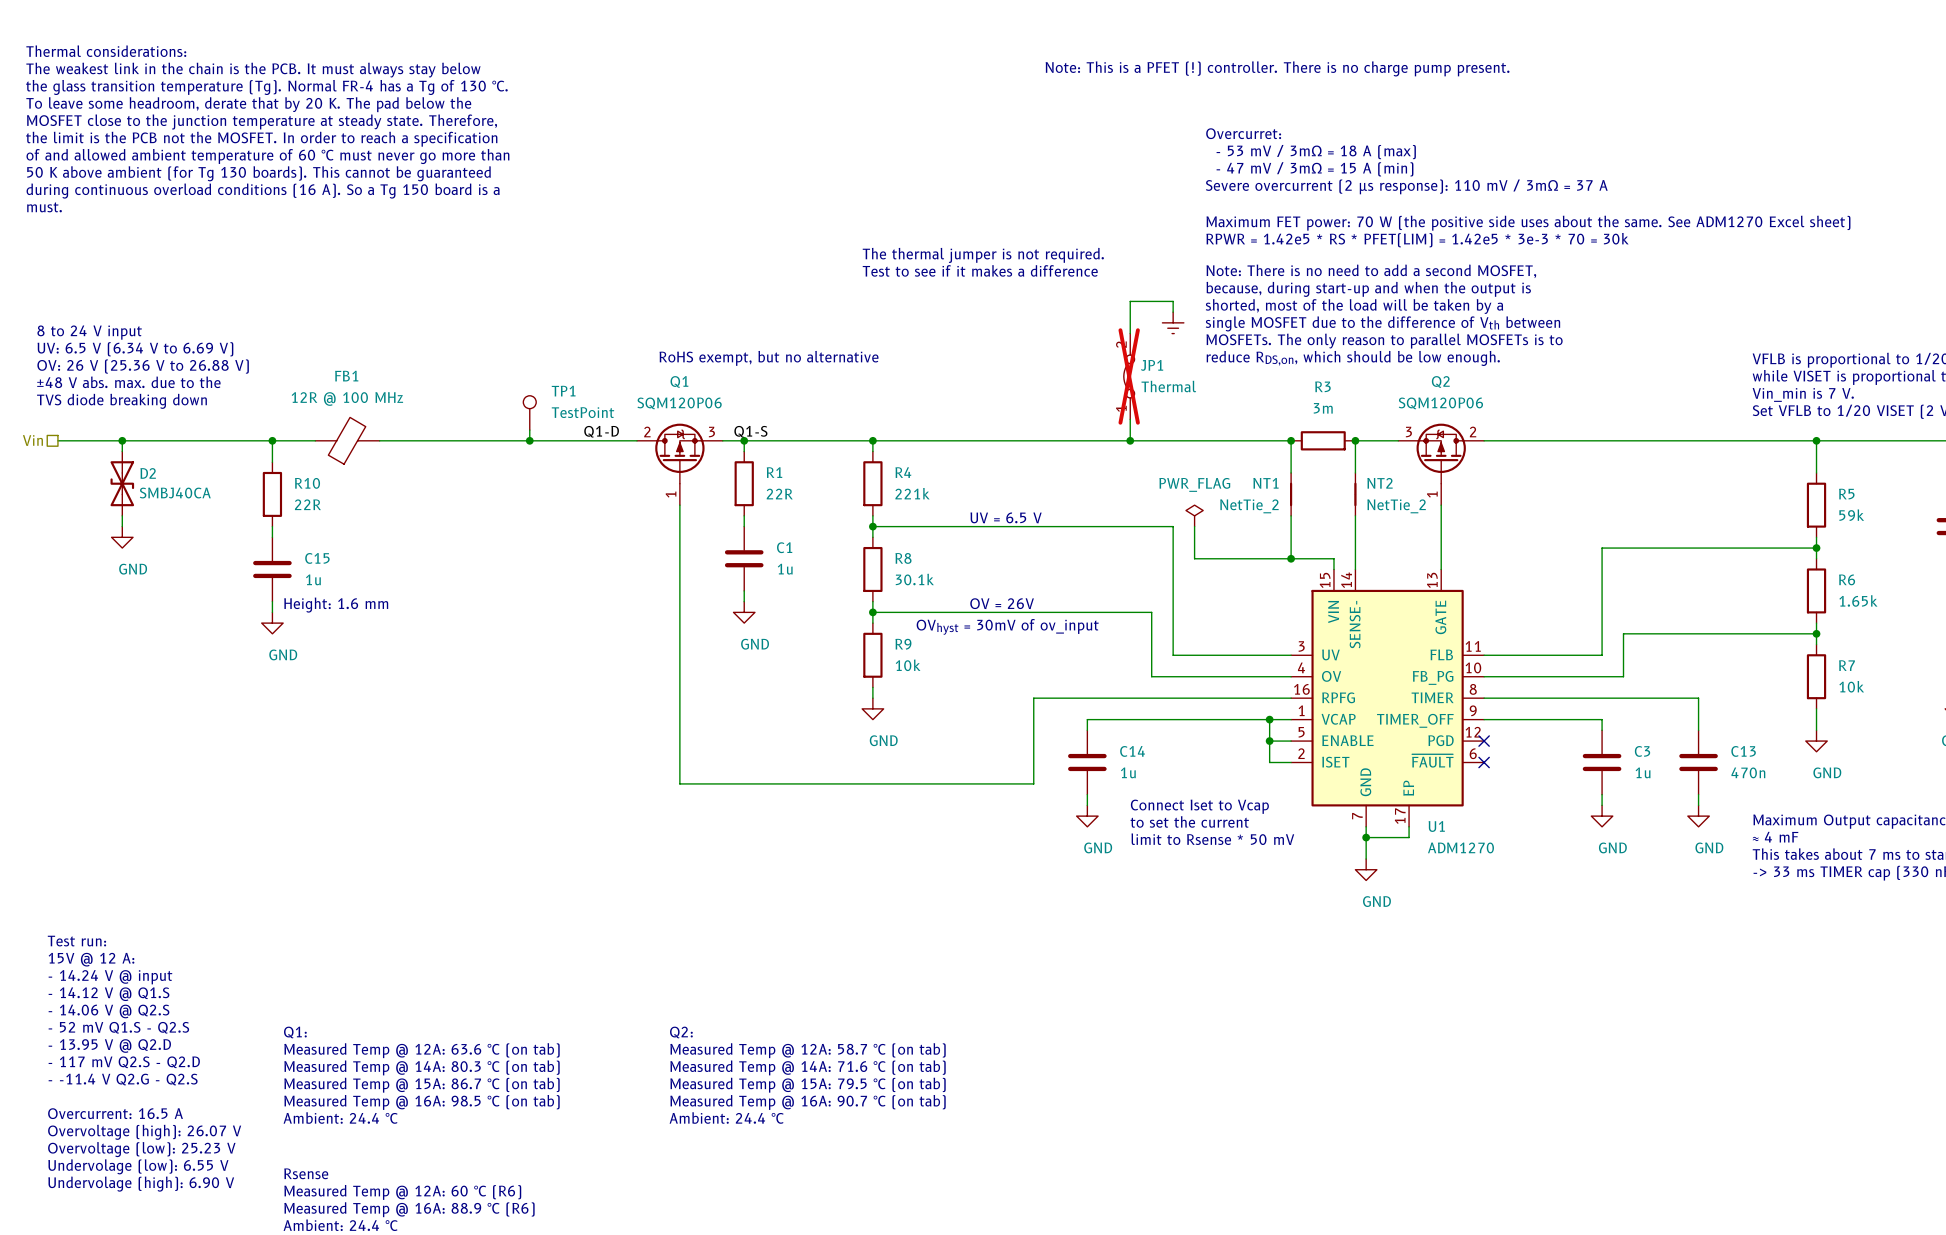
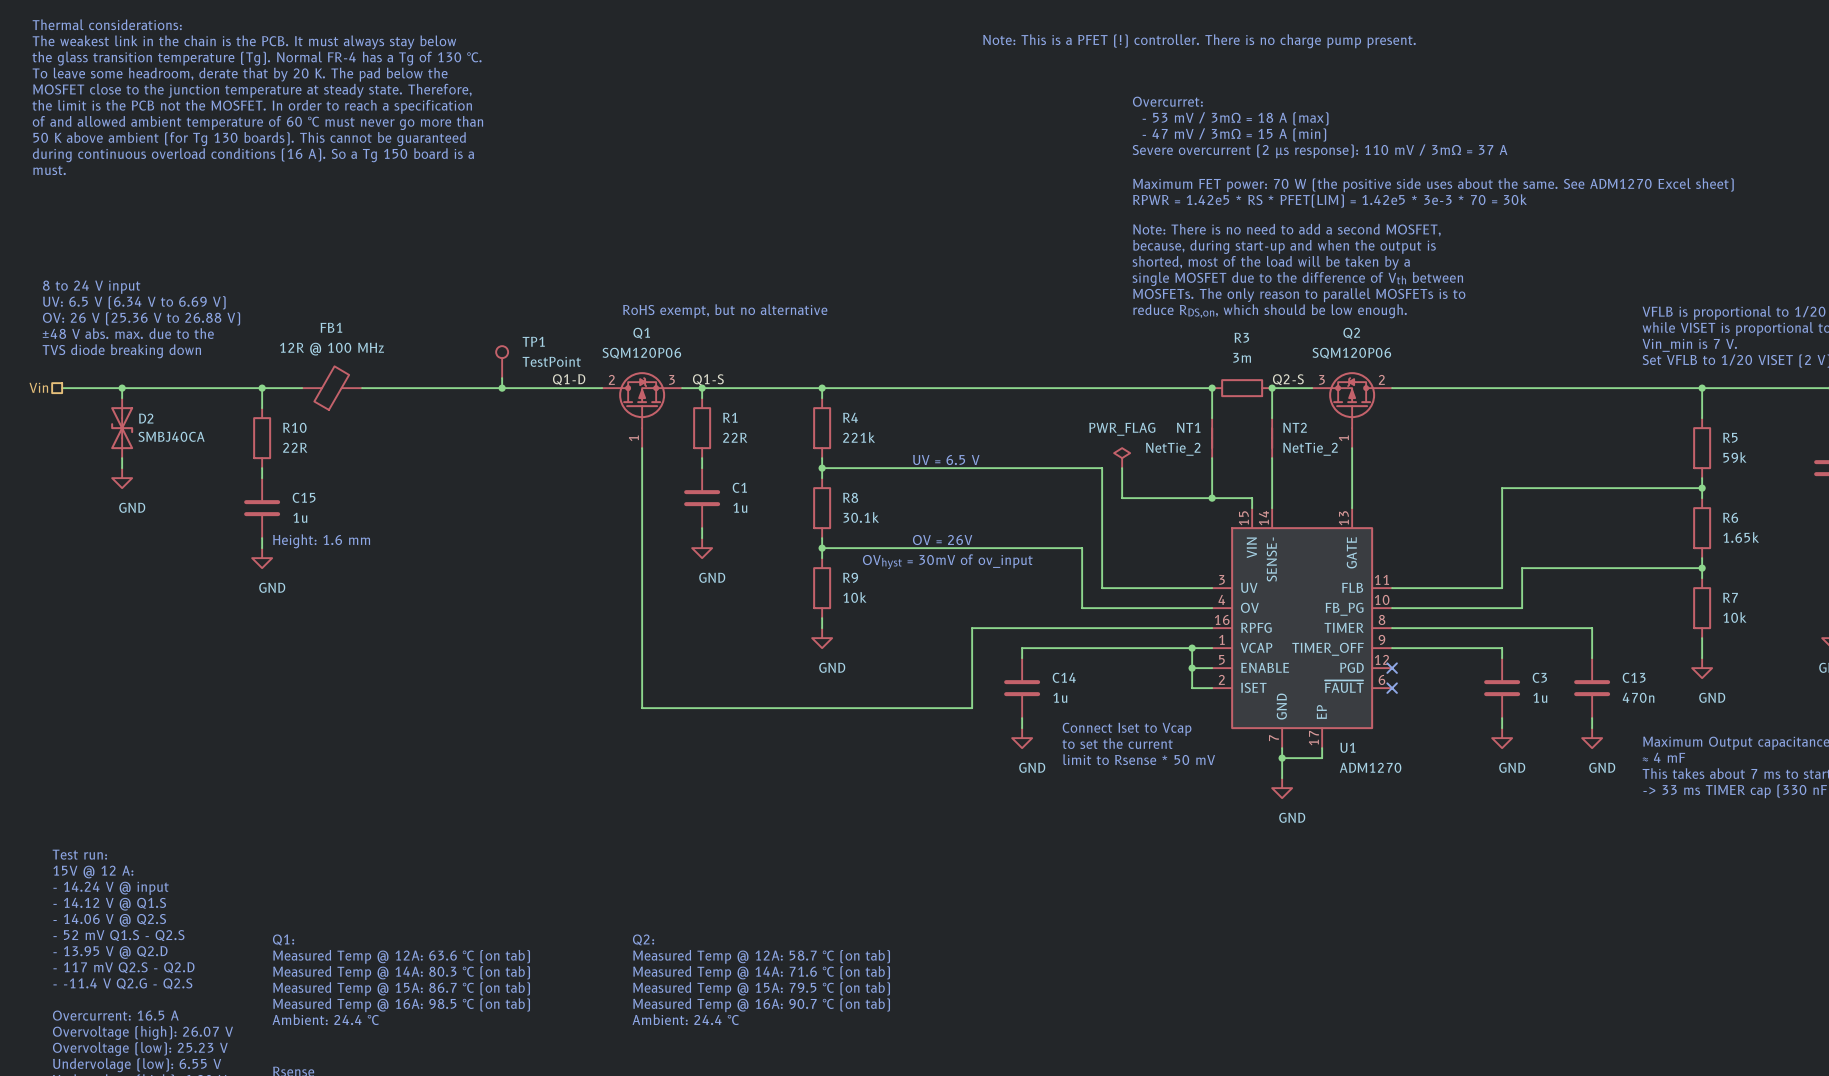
text: The thermal jumper is not required. (983, 255) -> none
text: Test to see if it makes a difference (980, 270) -> none
wire: (1173, 312) (1173, 301) (1130, 301) (1130, 333) -> none
power symbol: (1173, 322) -> none
JP1: Thermal (1129, 376) -> none
wire: (1130, 419) (1130, 440) -> none
label: none -> Q2-S (1288, 379)
junction: (1130, 440) -> none

